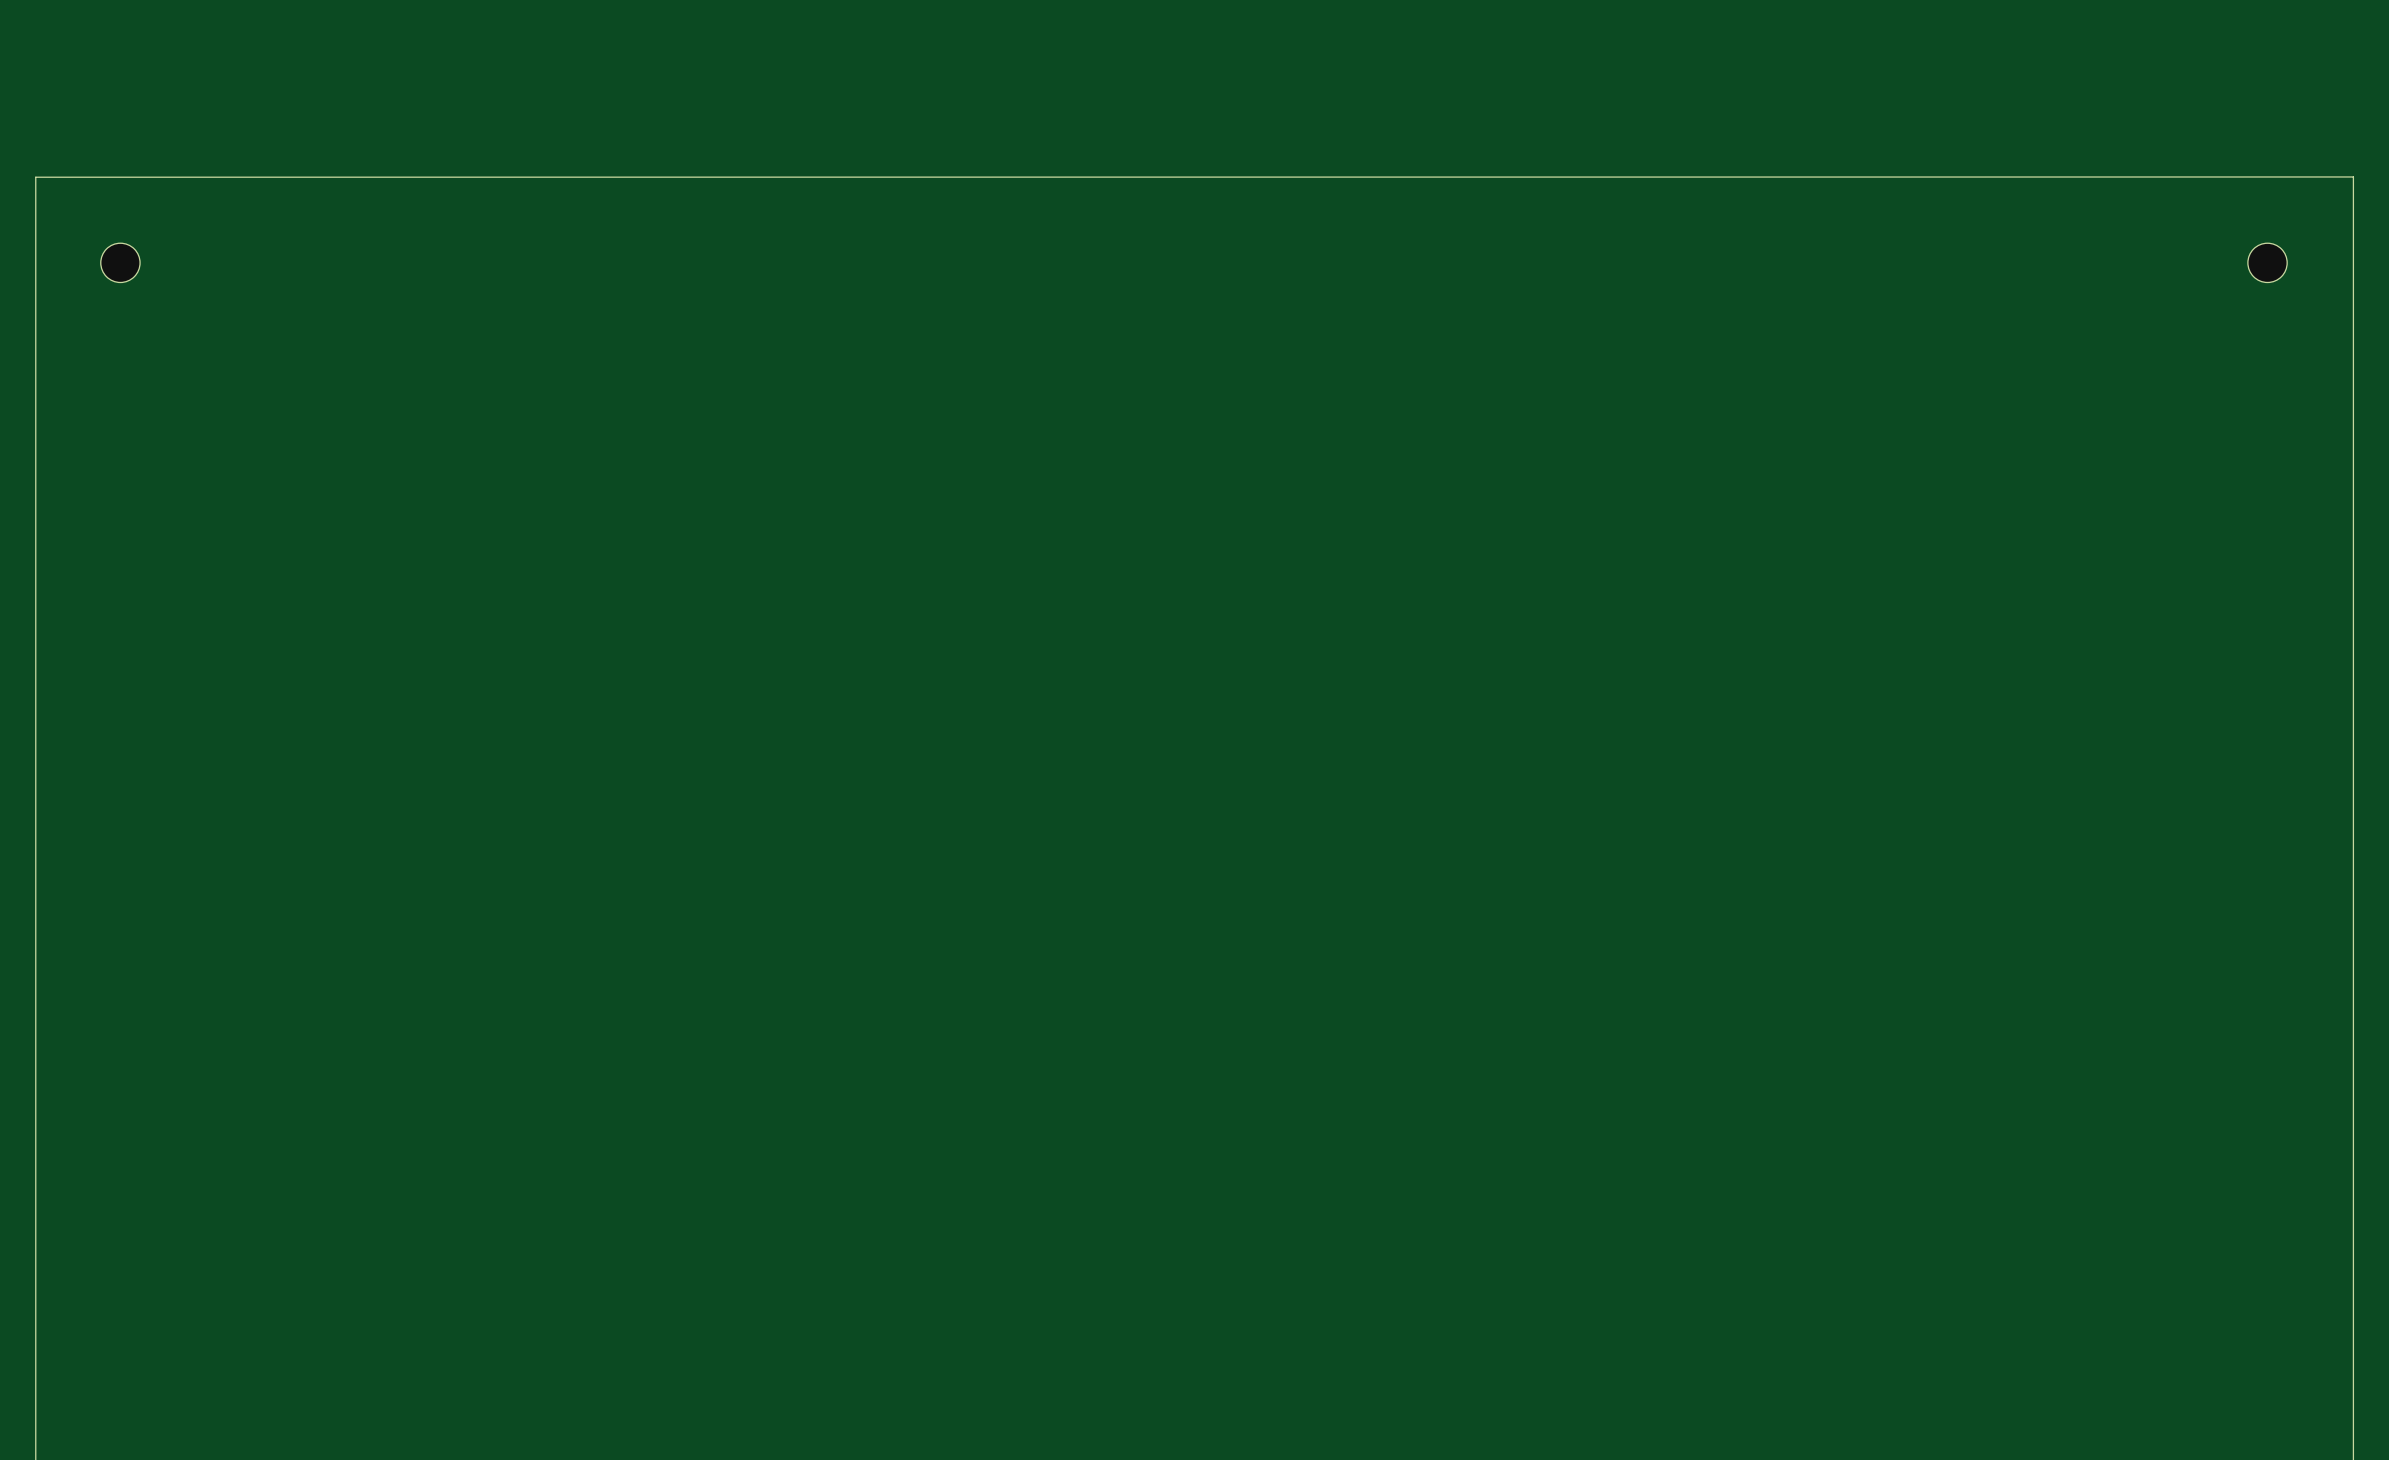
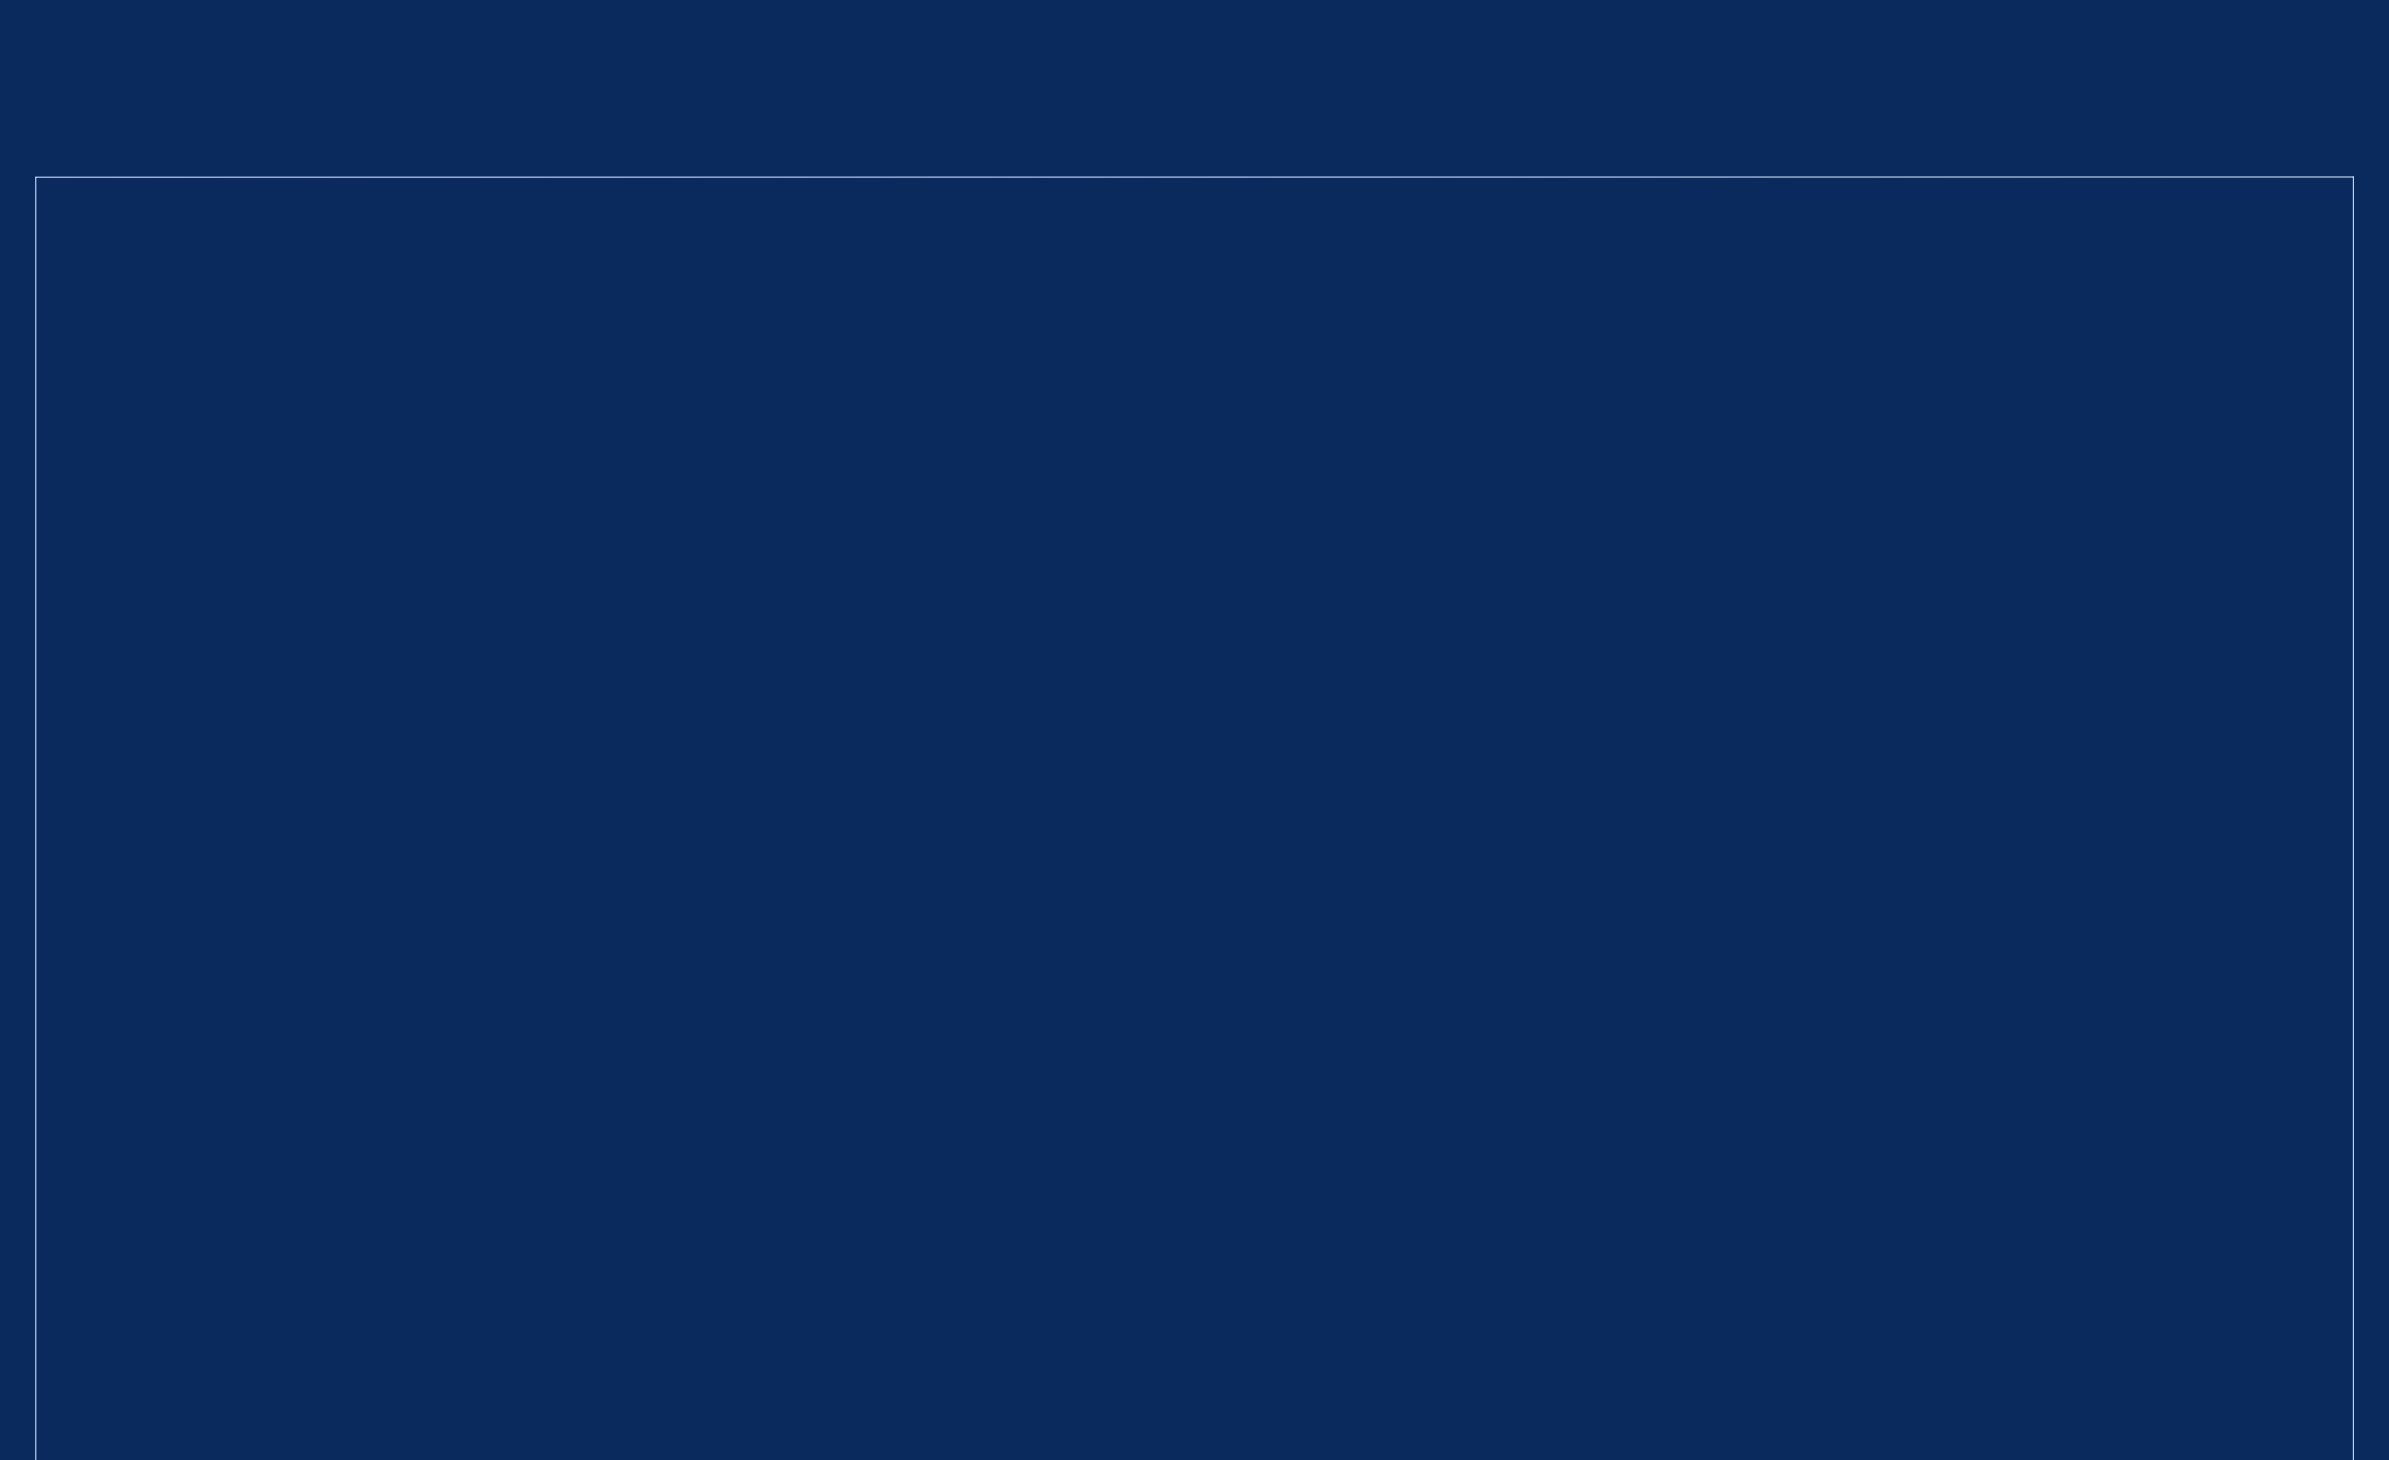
hole: (120, 262) -> none
hole: (2267, 262) -> none

